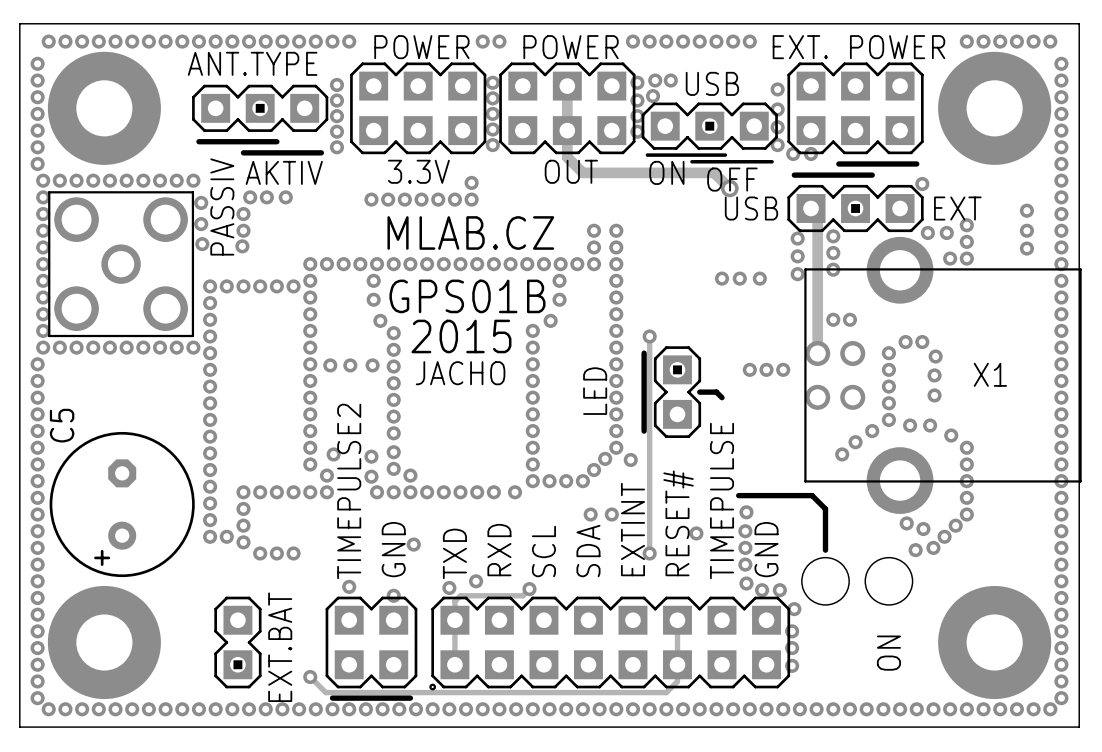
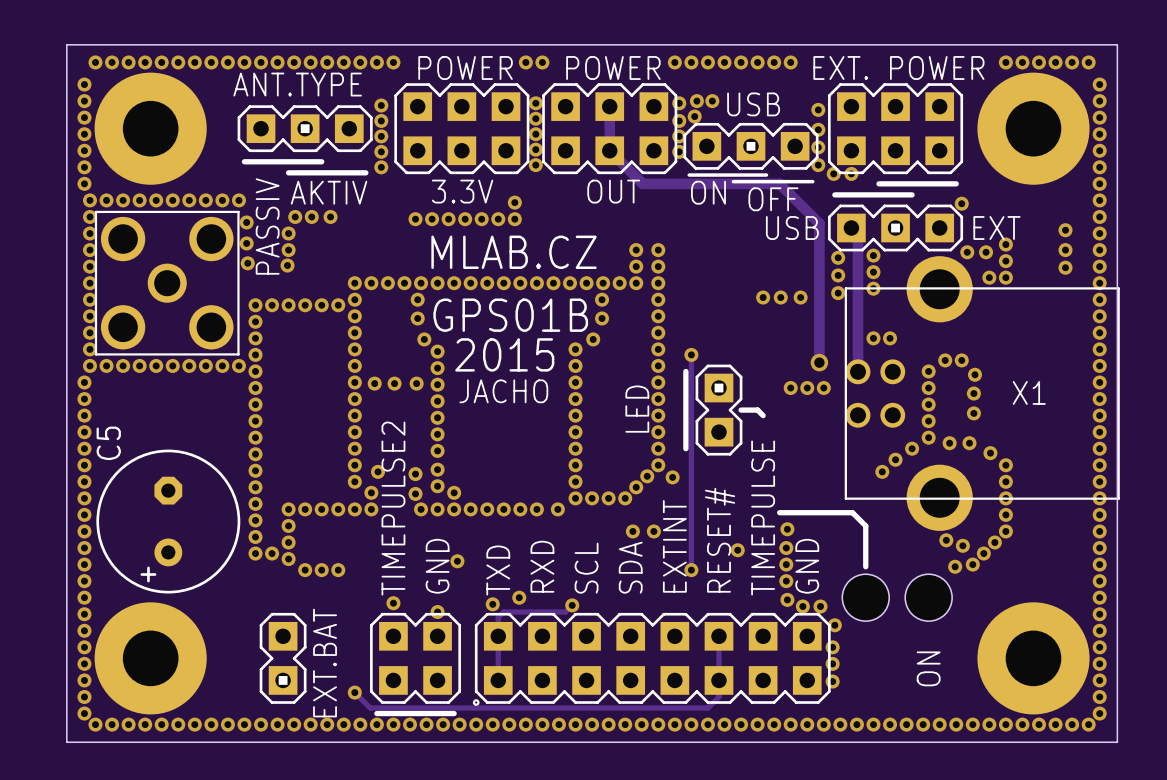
track: (567, 130) (567, 157) (582, 172) (714, 172) (729, 188) -> (609, 150) (642, 183) (779, 183) (819, 223) (819, 362)
via: (729, 188) -> none
via: none -> (819, 362)

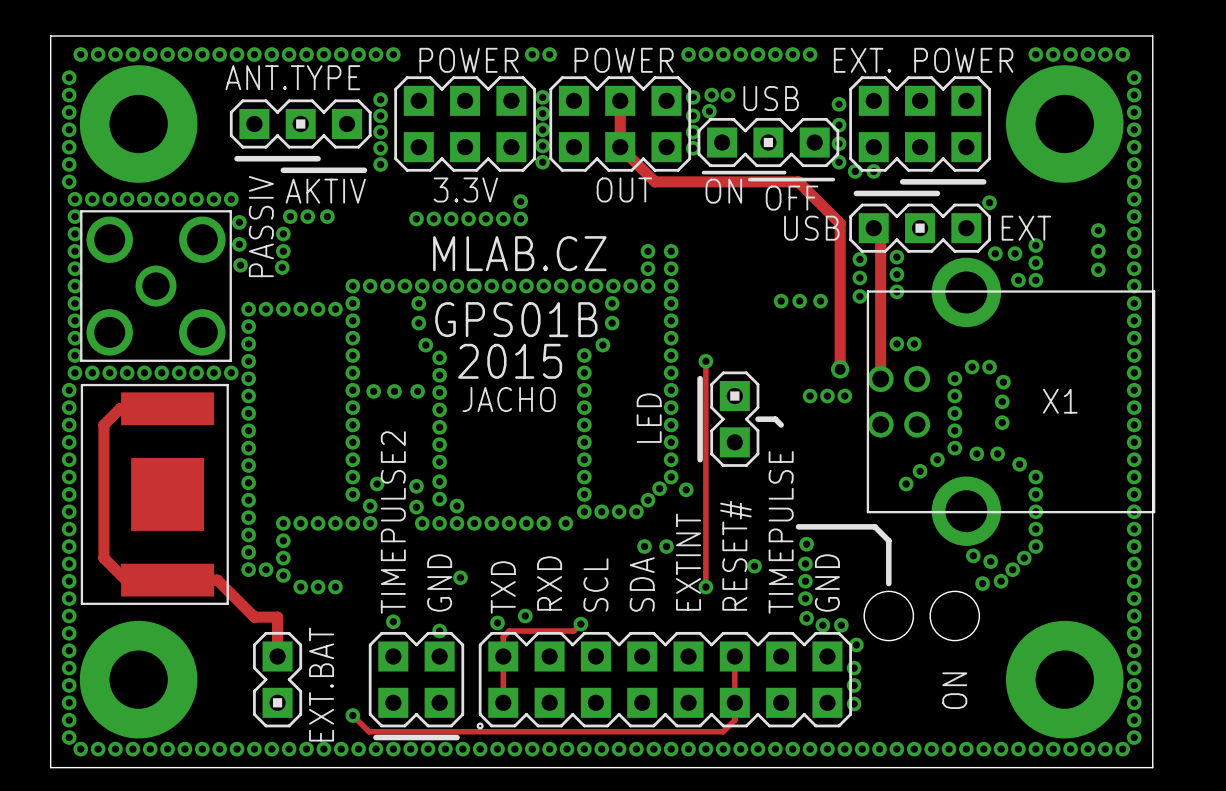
track: none -> (167, 408) (120, 408) (103, 424) (103, 558) (127, 581) (217, 580) (254, 617) (277, 617) (277, 656)
part: none -> (154, 494)
C5: (168, 521) -> none

